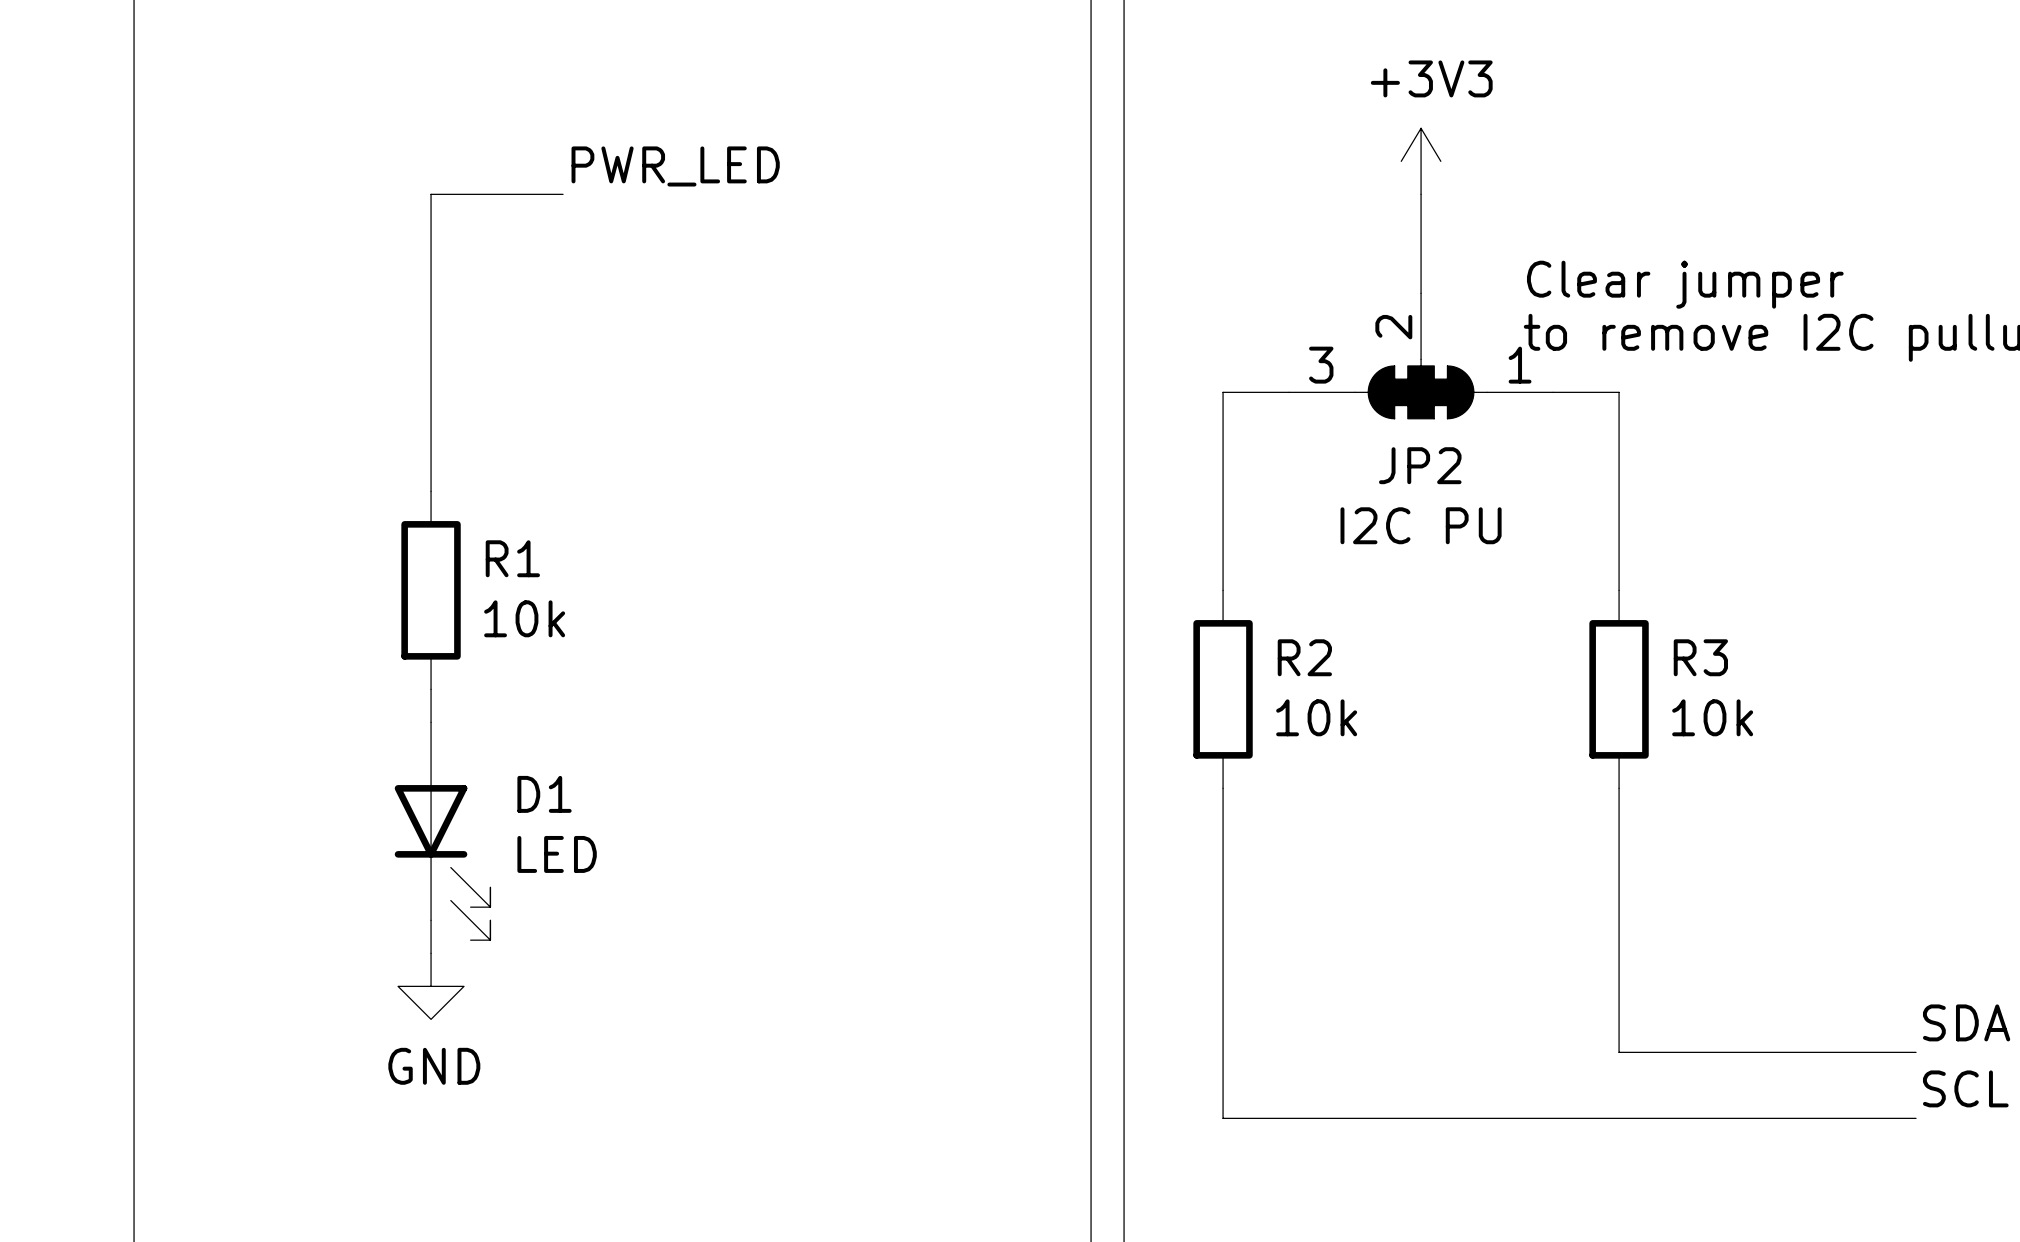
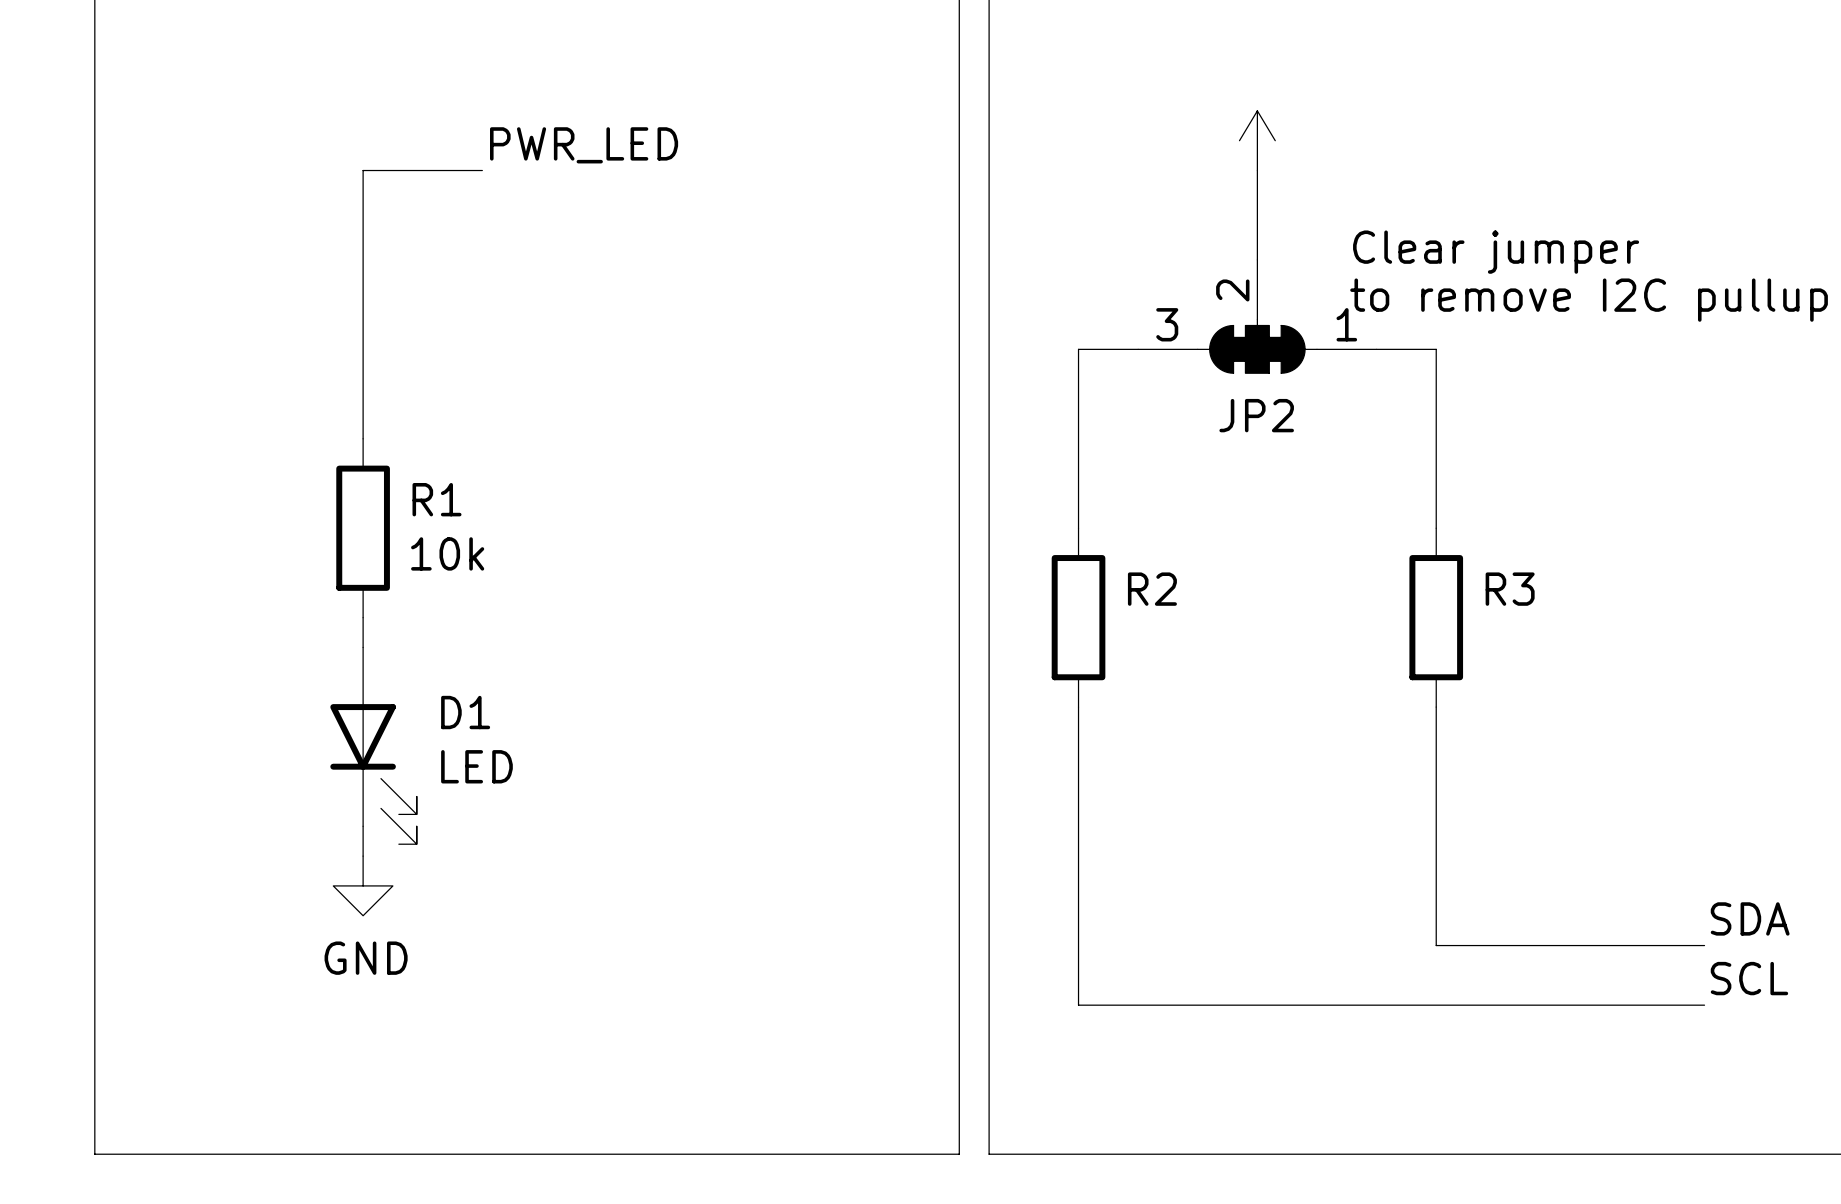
power symbol text: +3V3 (1431, 78) -> none
JP2 value: I2C PU (1421, 525) -> none
R2 value: 10k (1316, 717) -> none
R3 value: 10k (1712, 717) -> none

